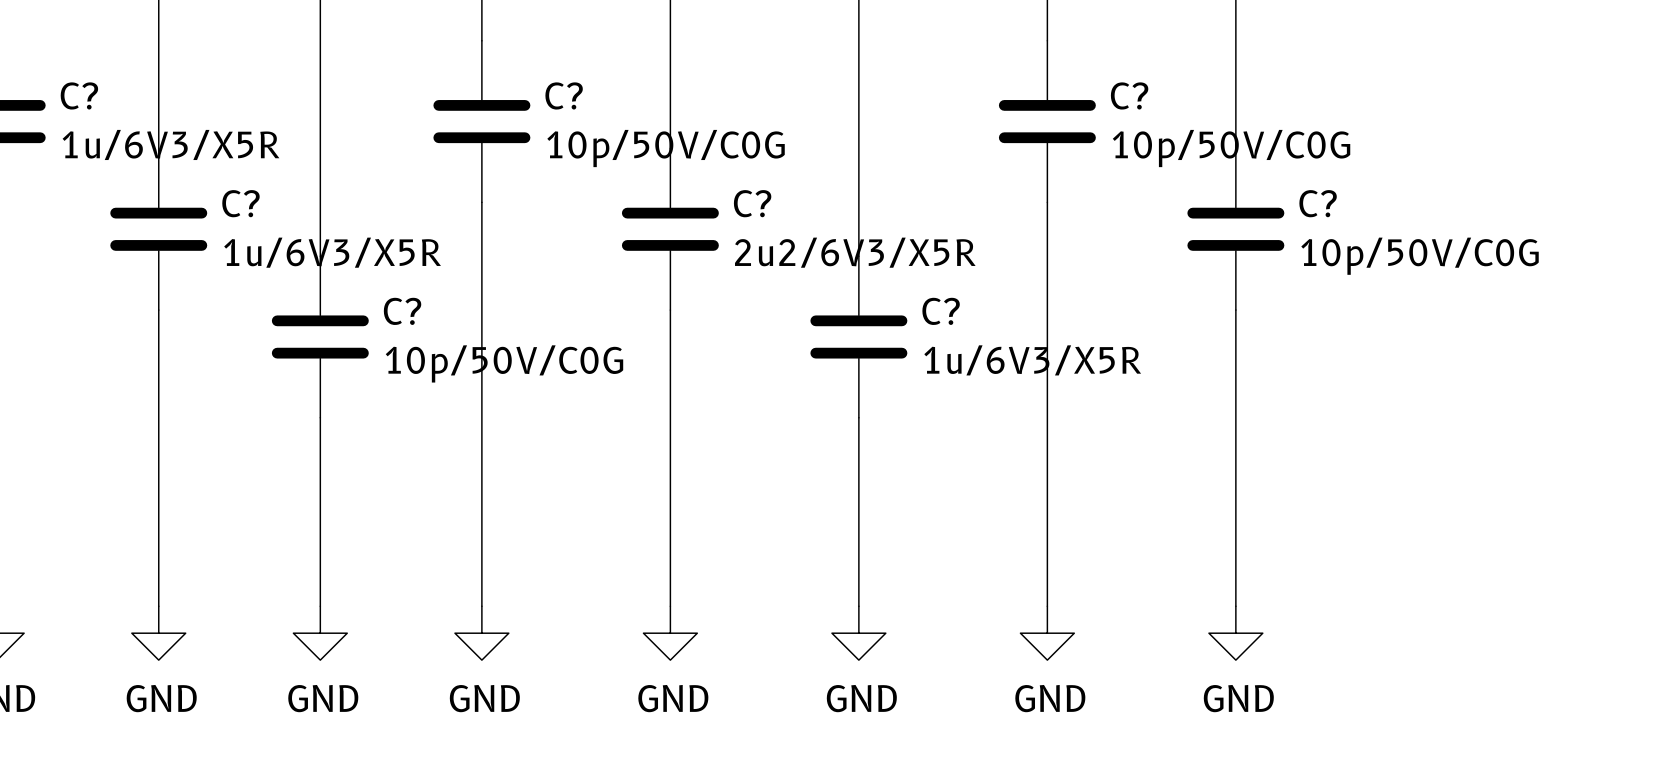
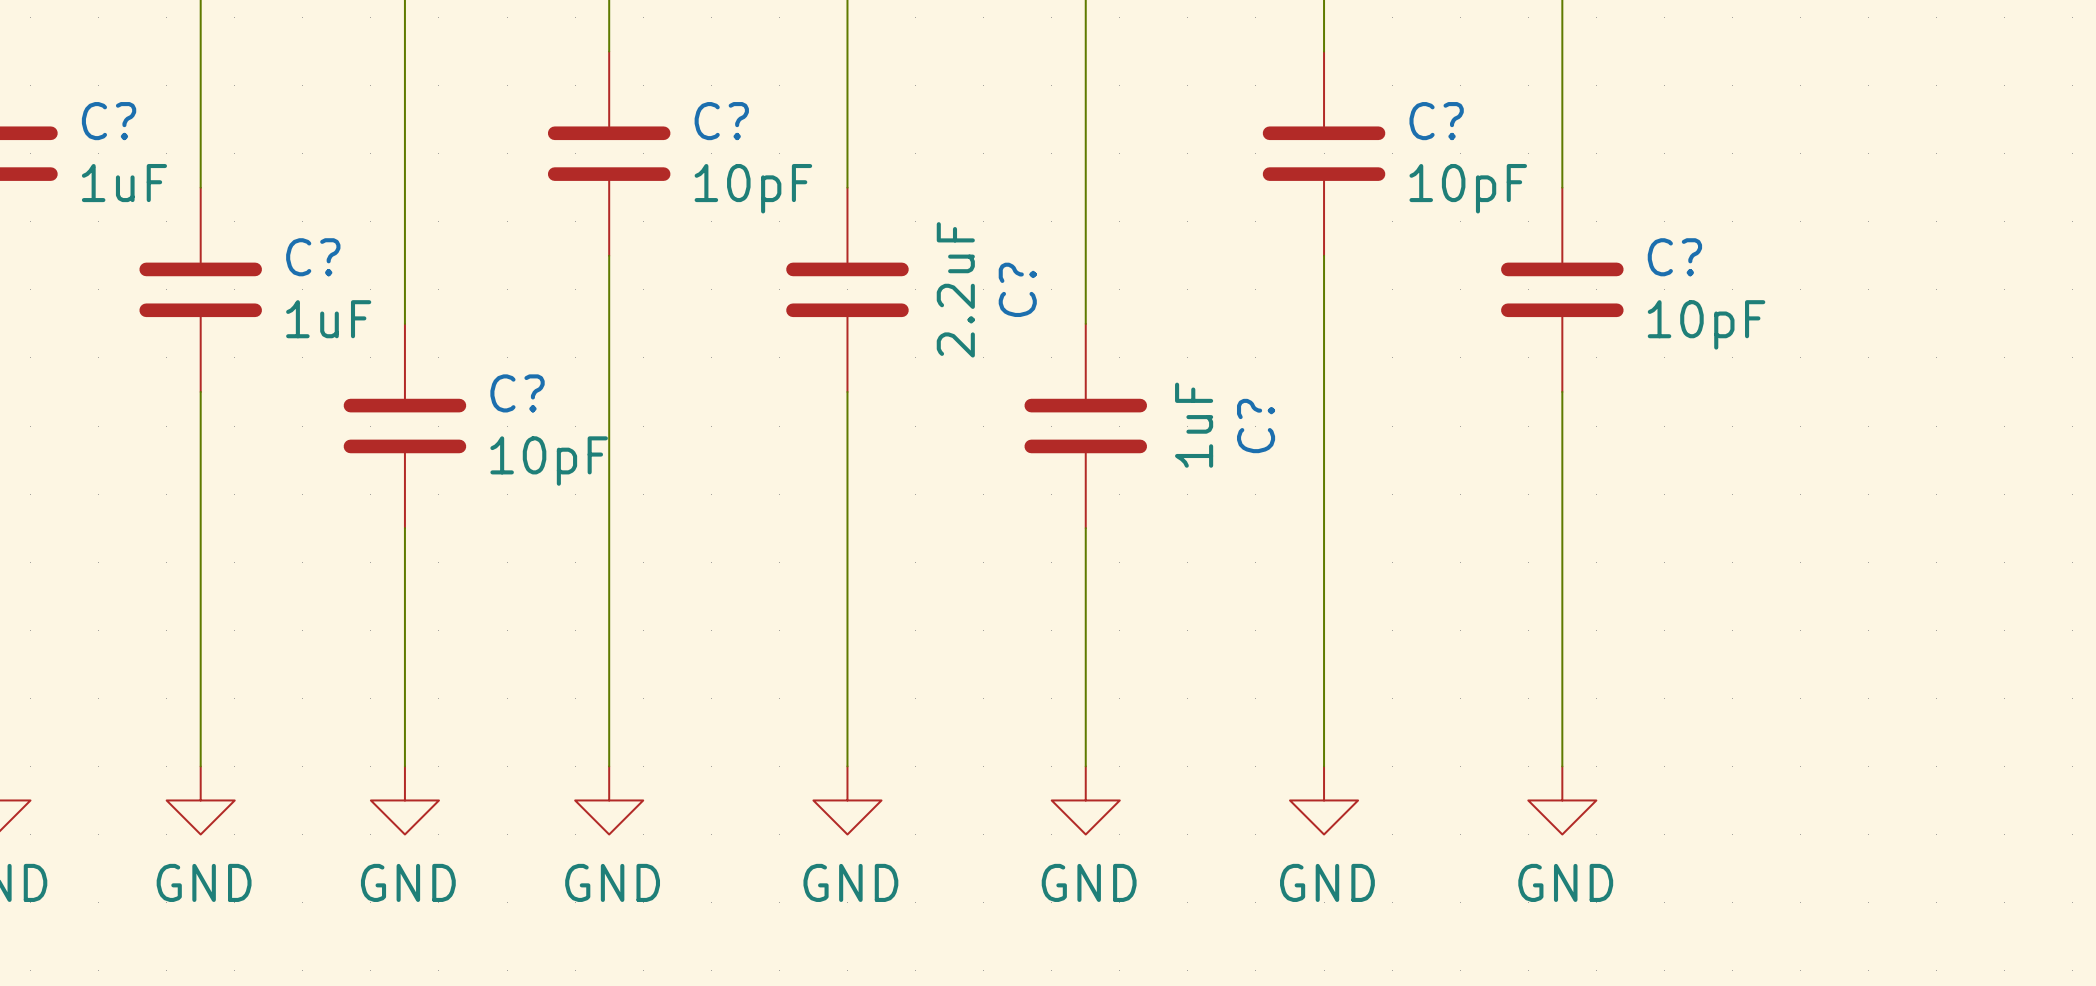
C? value: 1u/6V3/X5R (171, 144) -> 1uF (124, 183)
C? value: 10p/50V/C0G (666, 148) -> 10pF (753, 188)
C? value: 10p/50V/C0G (1231, 148) -> 10pF (1468, 188)
C? name rotation: 0° (752, 203) -> 90° counterclockwise (1017, 289)
C? value: 1u/6V3/X5R (332, 252) -> 1uF (328, 319)
C? value: 2u2/6V3/X5R (855, 252) -> 2.2uF (955, 289)
C? value: 10p/50V/C0G (1420, 256) -> 10pF (1706, 324)
C? name rotation: 0° (941, 311) -> 90° counterclockwise (1256, 426)
C? value: 1u/6V3/X5R (1032, 360) -> 1uF (1194, 425)
C? value: 10p/50V/C0G (504, 363) -> 10pF (549, 461)

